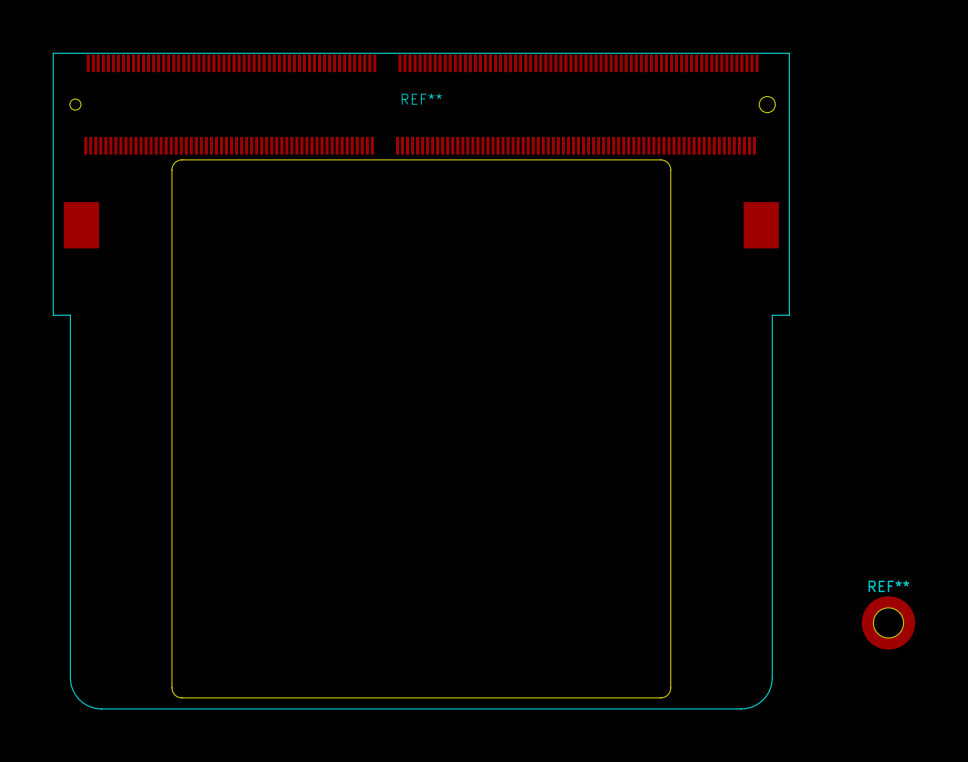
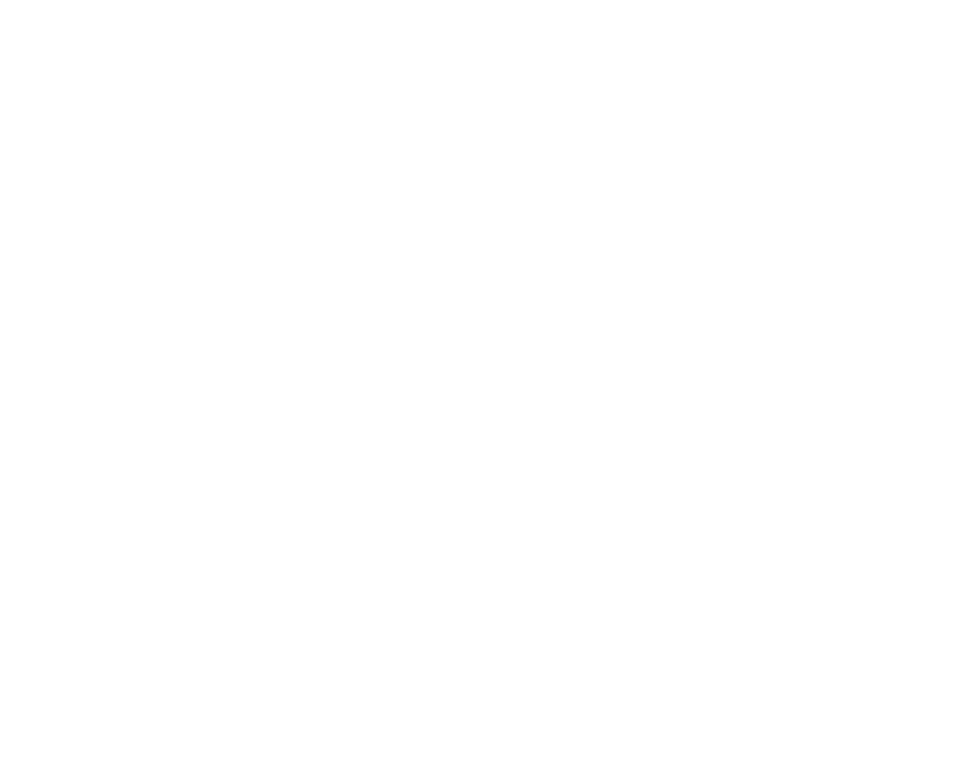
REF**: (421, 381) -> none
REF**: (888, 622) -> none

